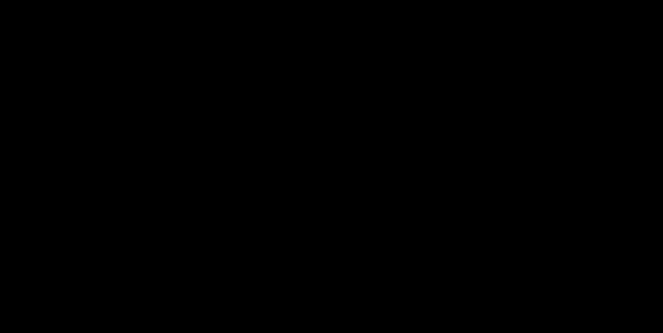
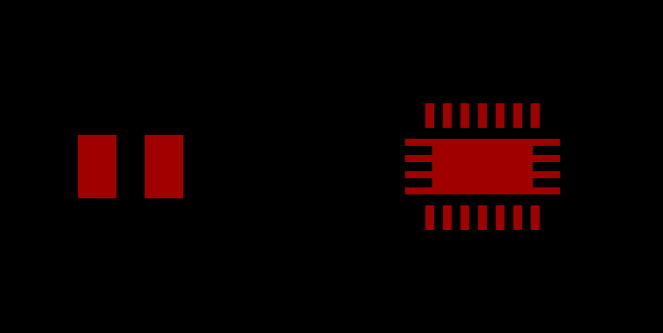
part: none -> (130, 166)
part: none -> (482, 166)

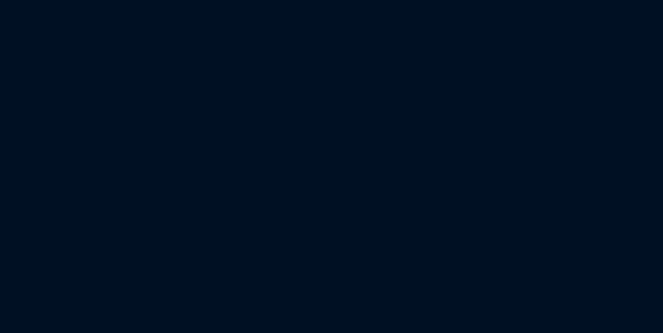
part: (130, 166) -> none
part: (482, 166) -> none

